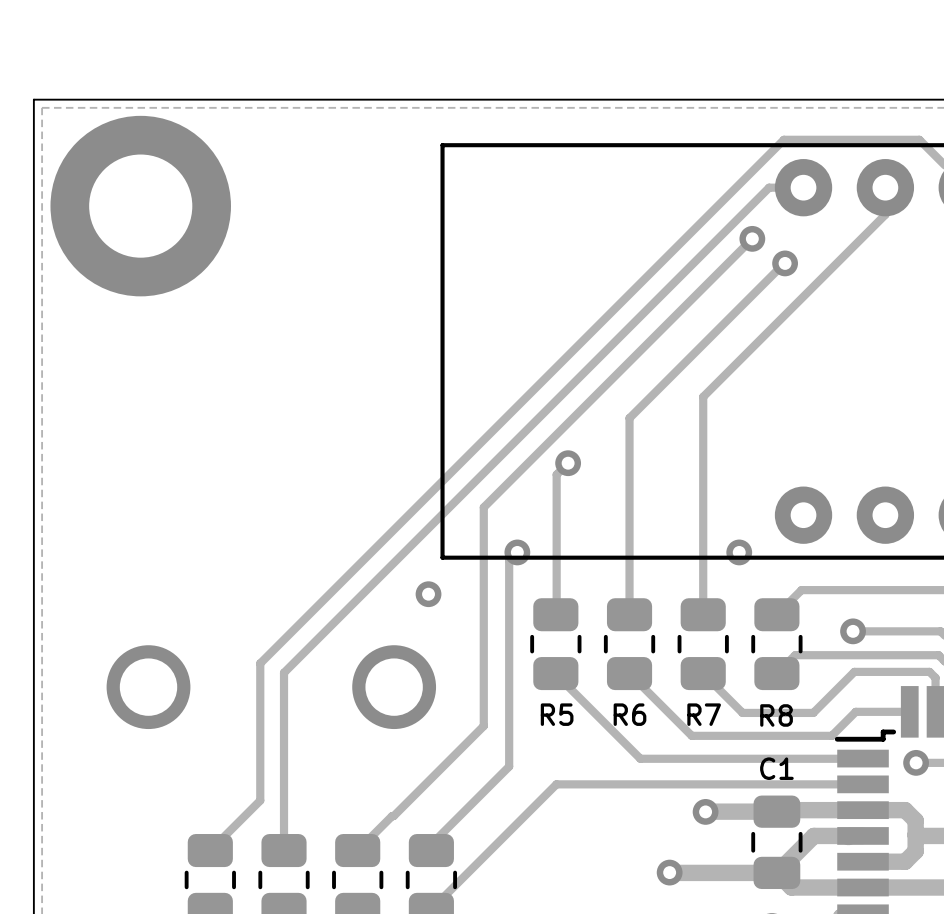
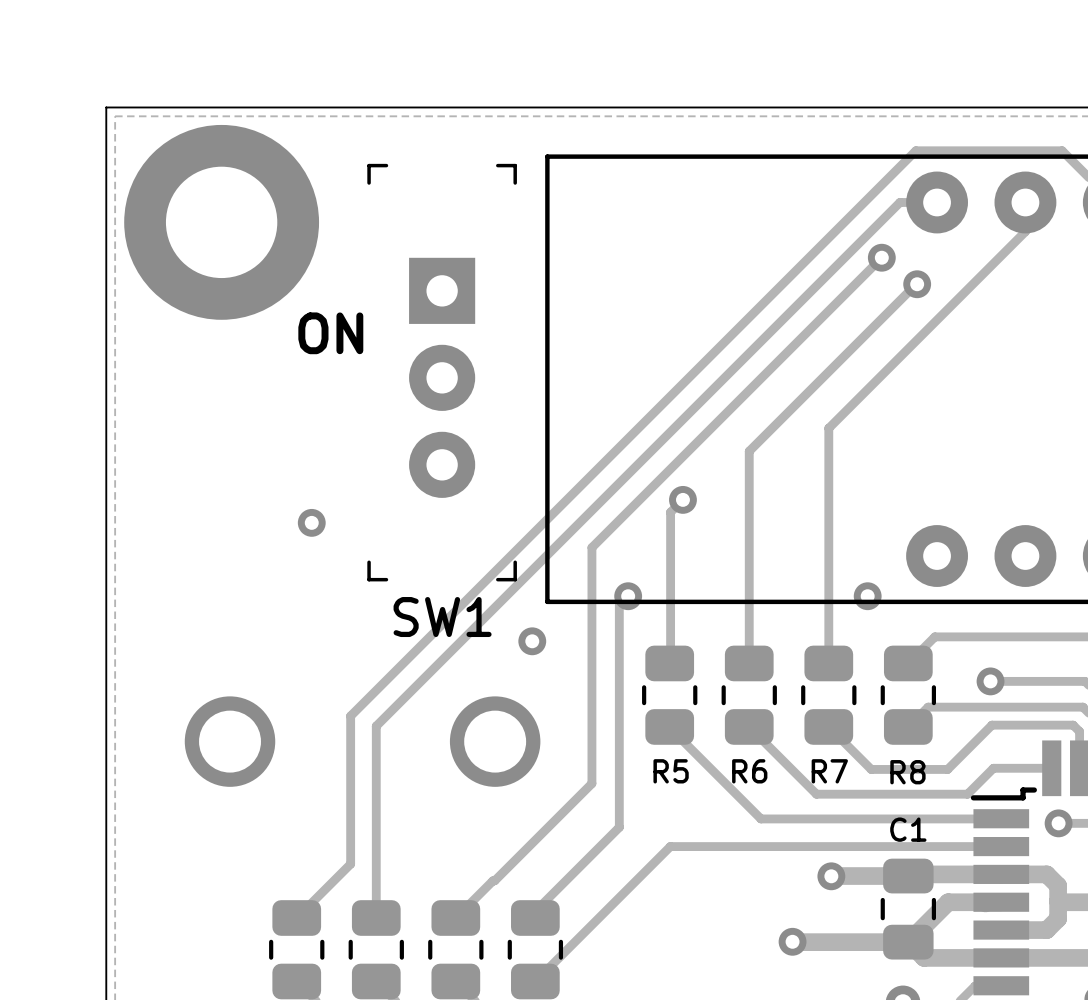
text: none -> ON (330, 333)
SW1: none -> (442, 372)
via: none -> (311, 522)

